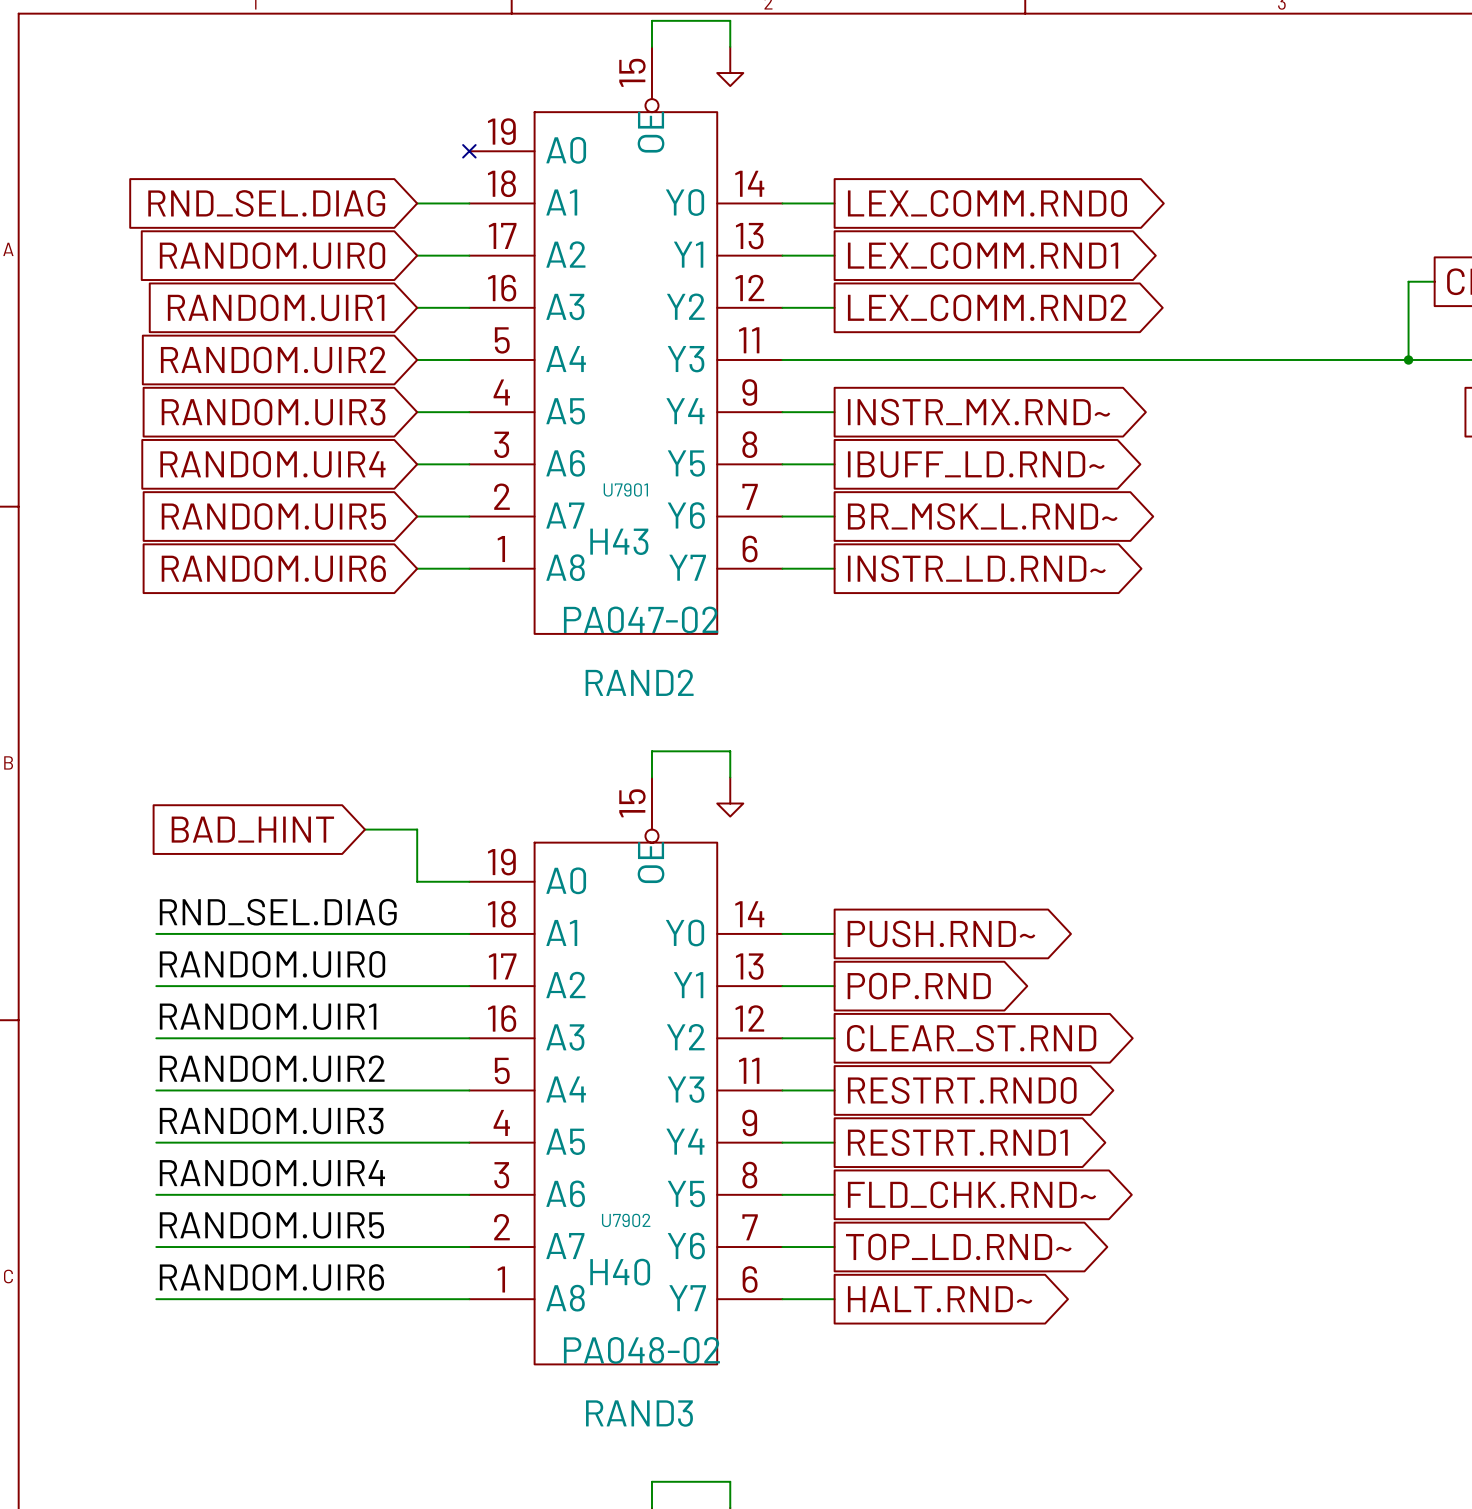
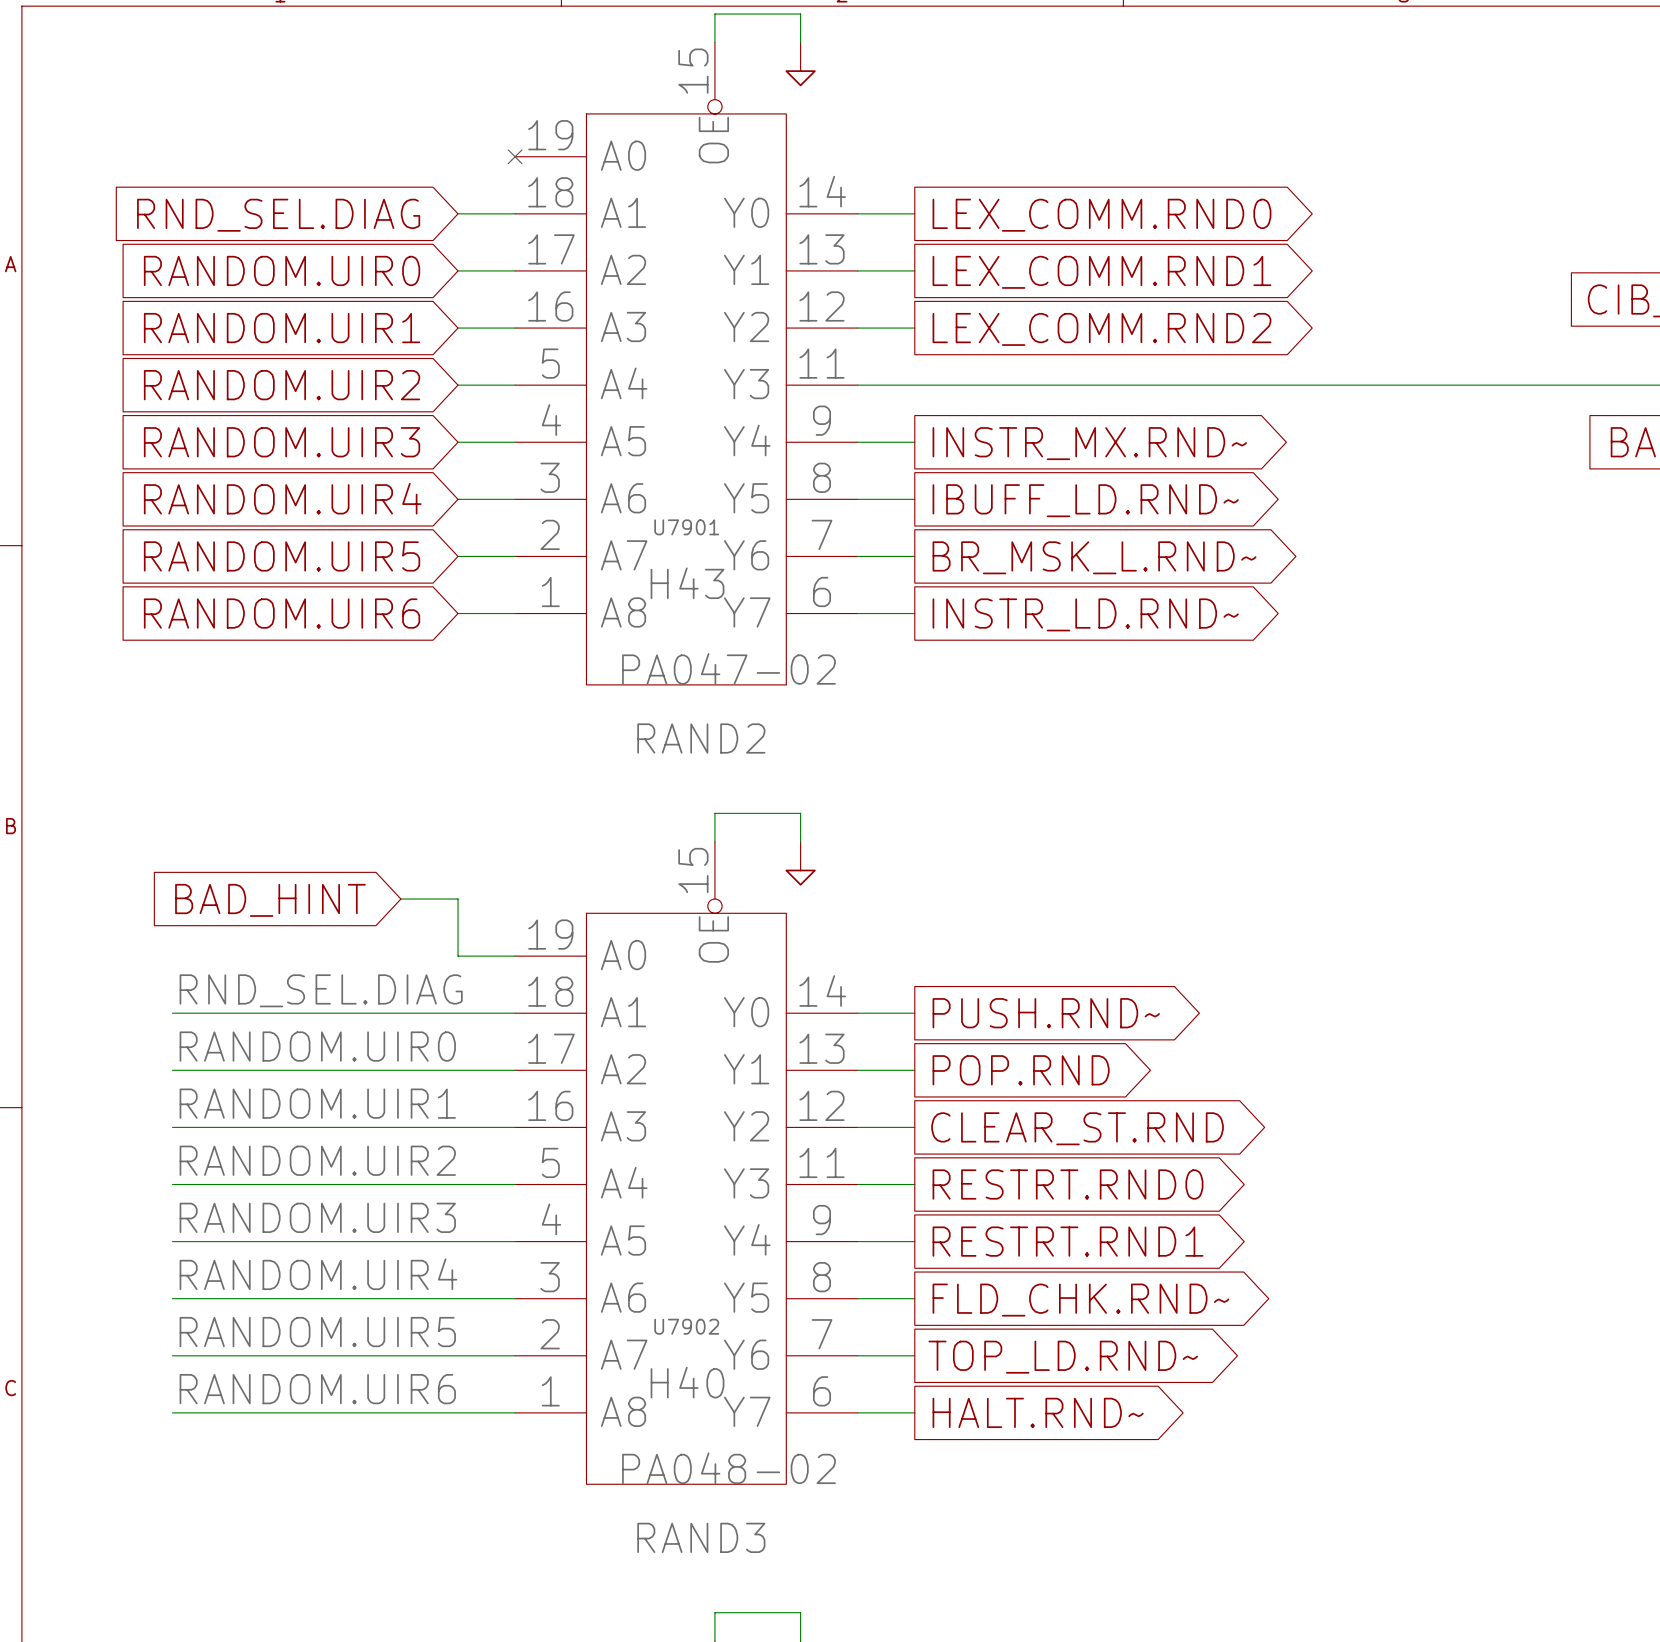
wire: (1434, 281) (1408, 281) (1408, 359) -> none
junction: (1408, 359) -> none

